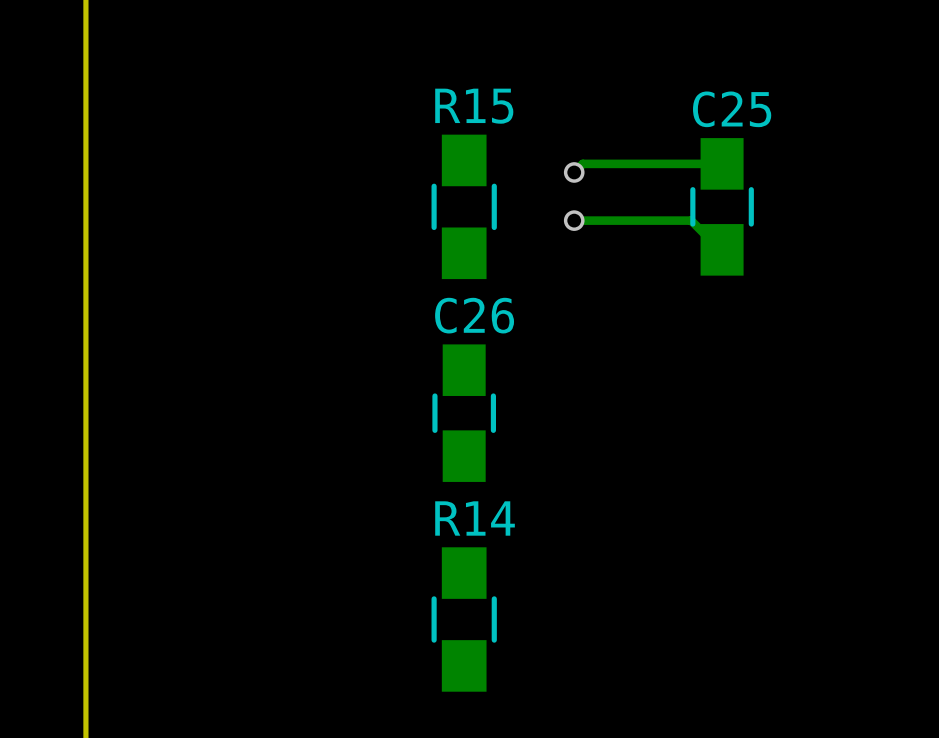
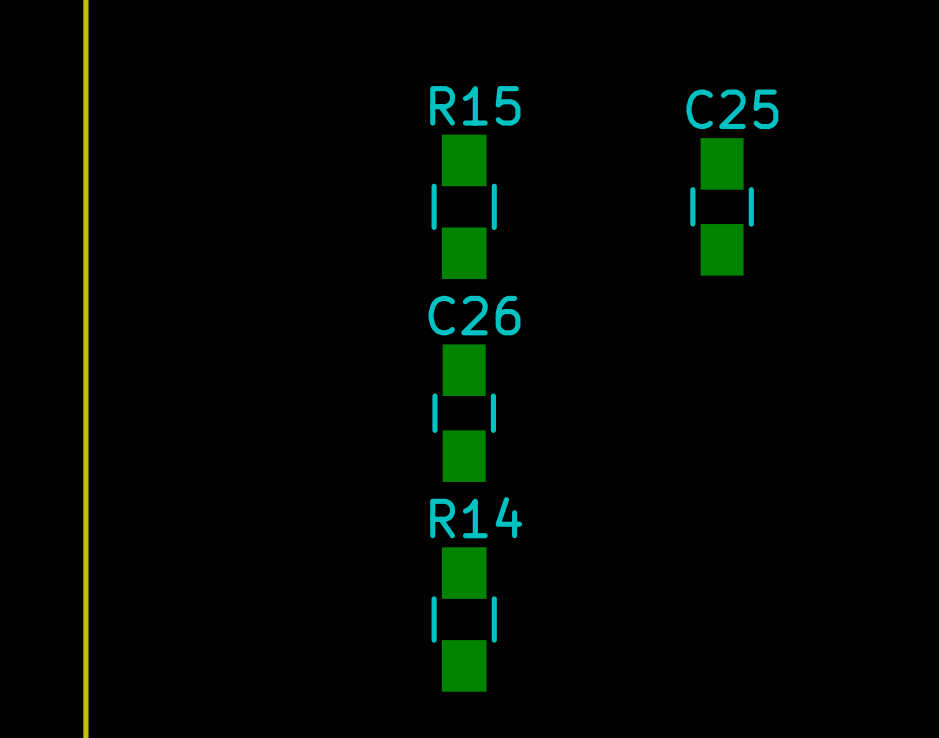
track: (722, 163) (582, 163) (574, 172) -> none
via: (574, 172) -> none
track: (574, 220) (691, 220) (722, 249) -> none
via: (574, 220) -> none

